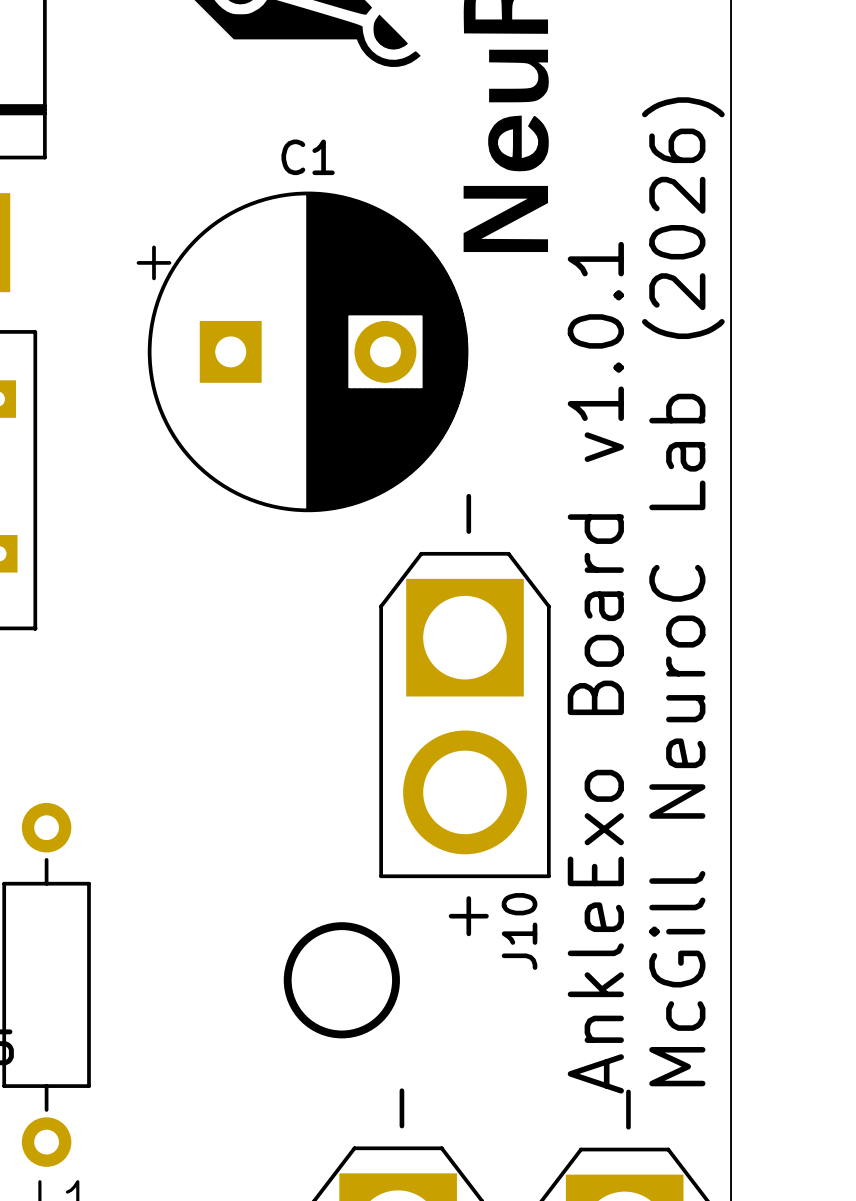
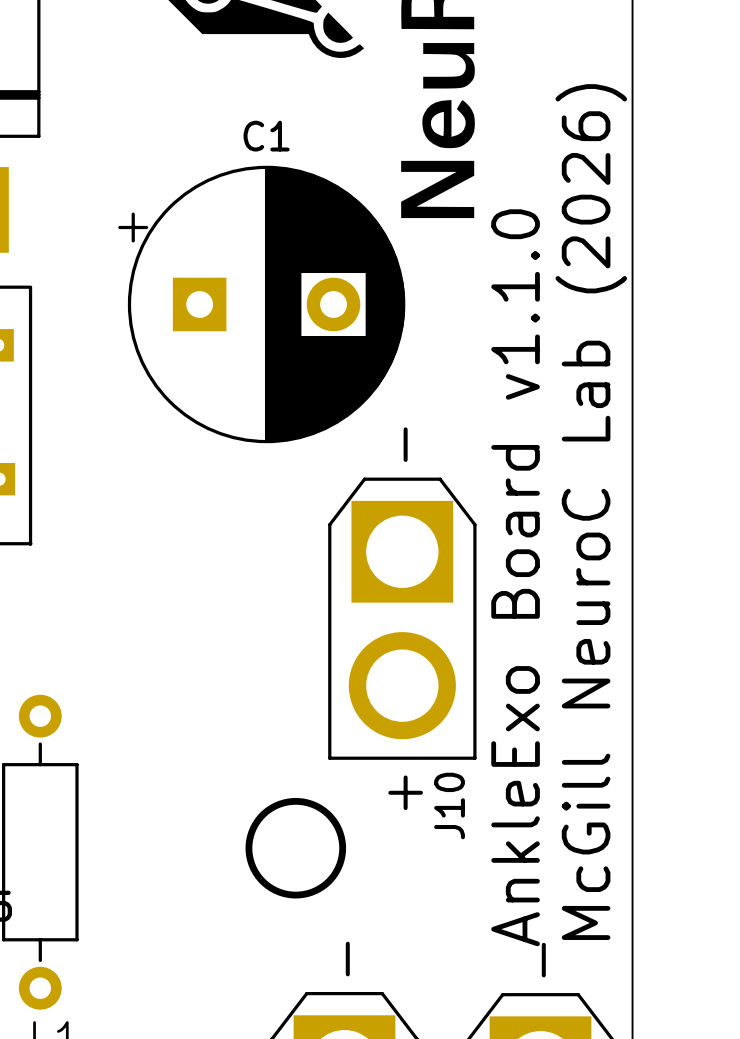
text: AnkleExo Board v1.0.1 (595, 667) -> AnkleExo Board v1.1.0 (515, 577)

